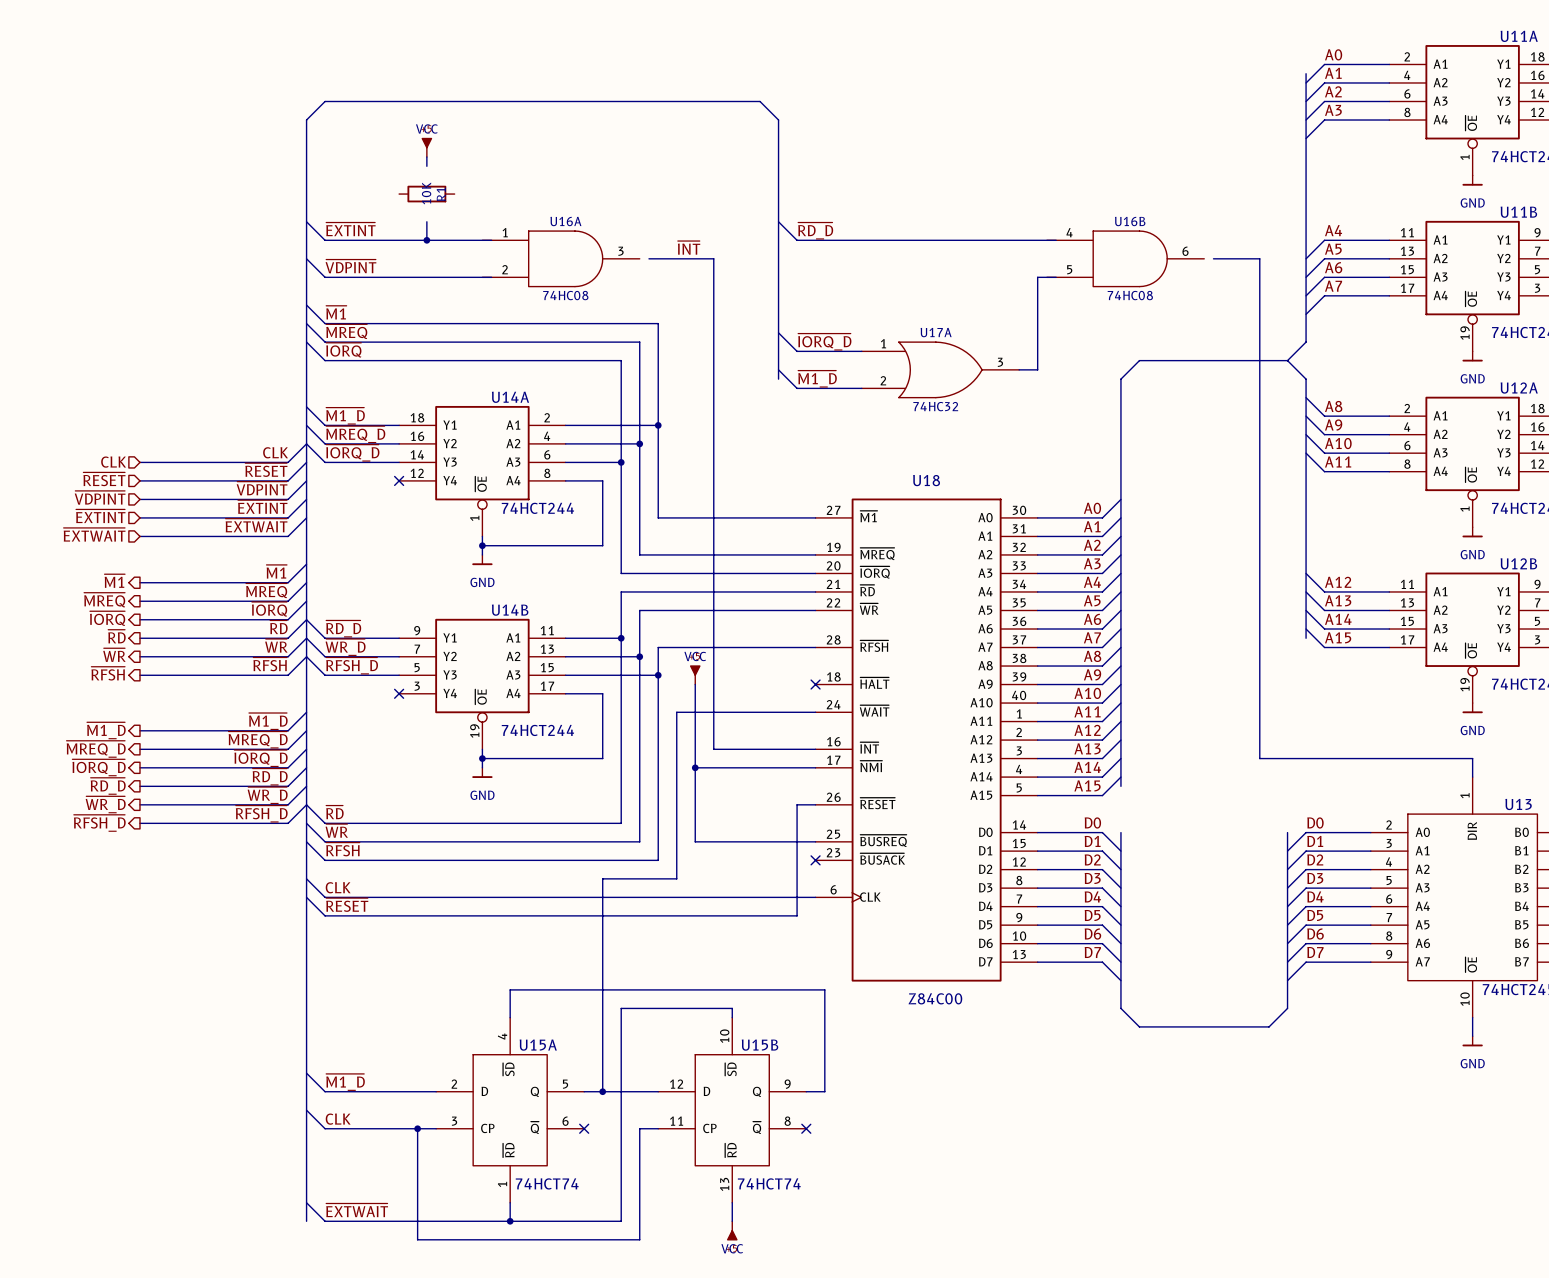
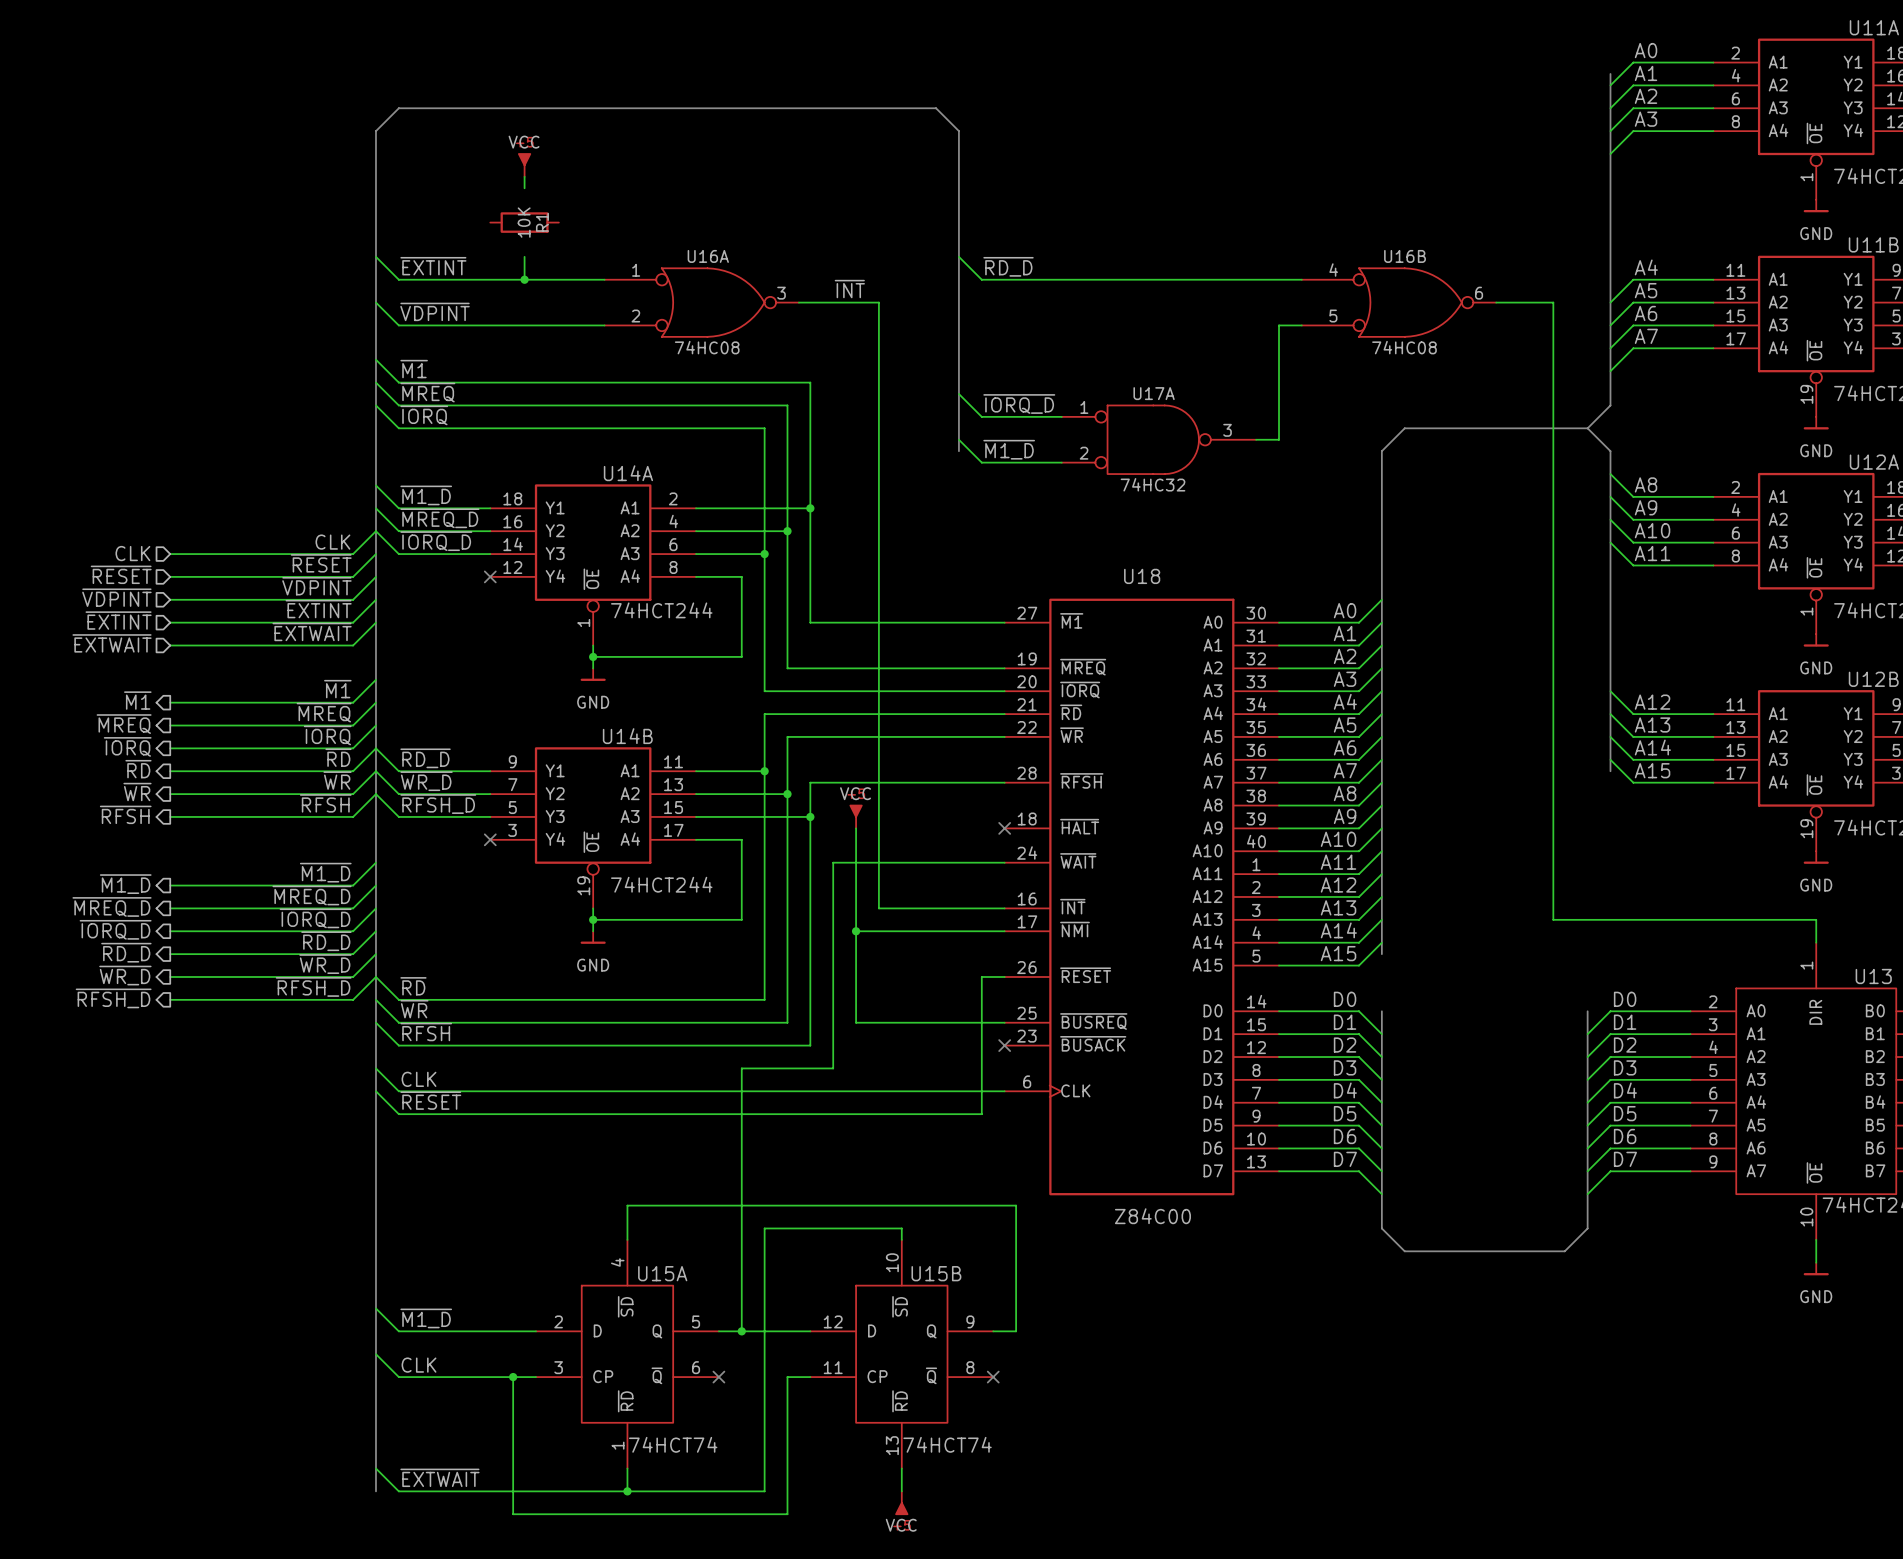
U16A symbol: [482, 231, 640, 287] -> [604, 268, 799, 337]
U16B symbol: [1046, 231, 1205, 287] -> [1301, 268, 1497, 337]
U17A symbol: [861, 342, 1020, 398] -> [1061, 405, 1257, 475]

